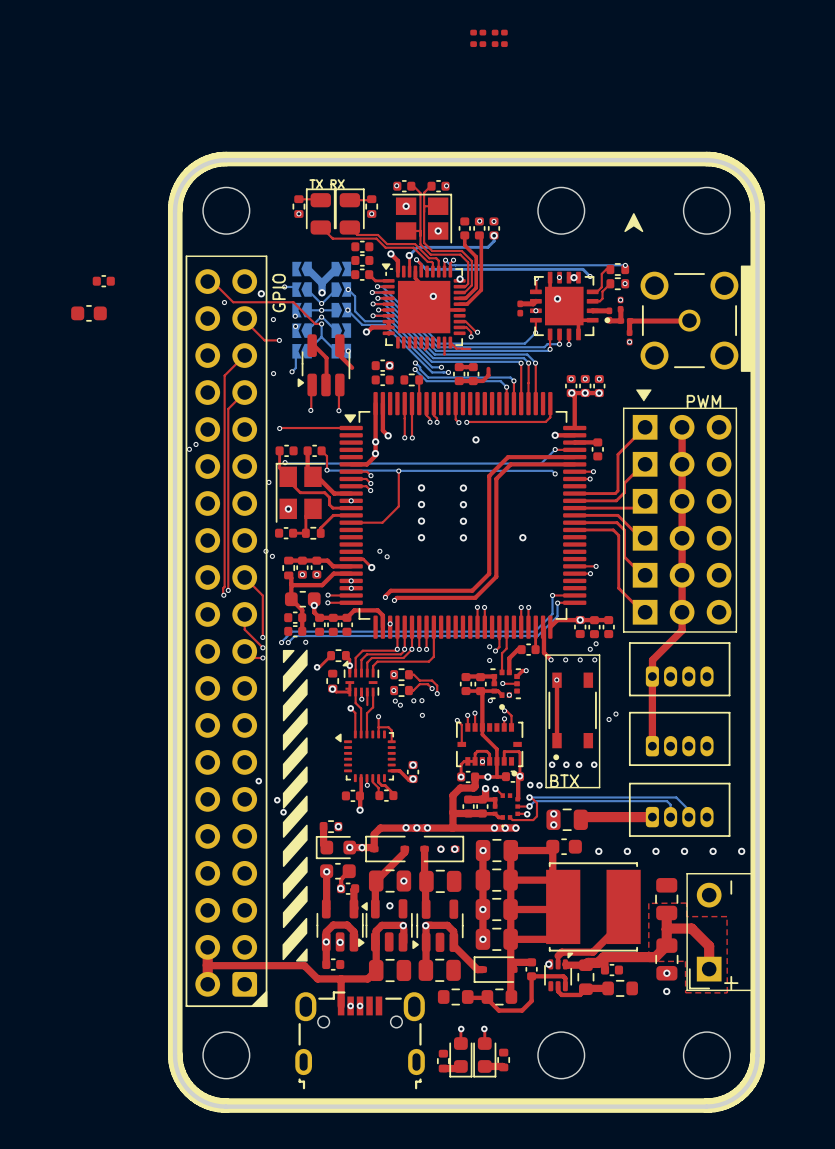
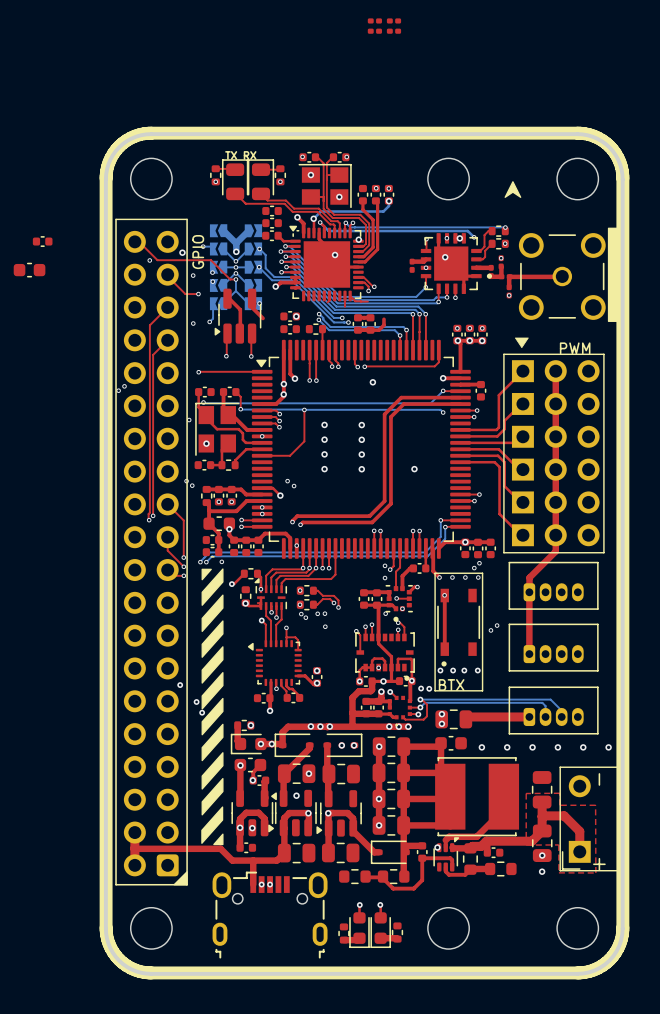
via: (349, 665) -> none
via: none -> (260, 589)
via: none -> (276, 617)

